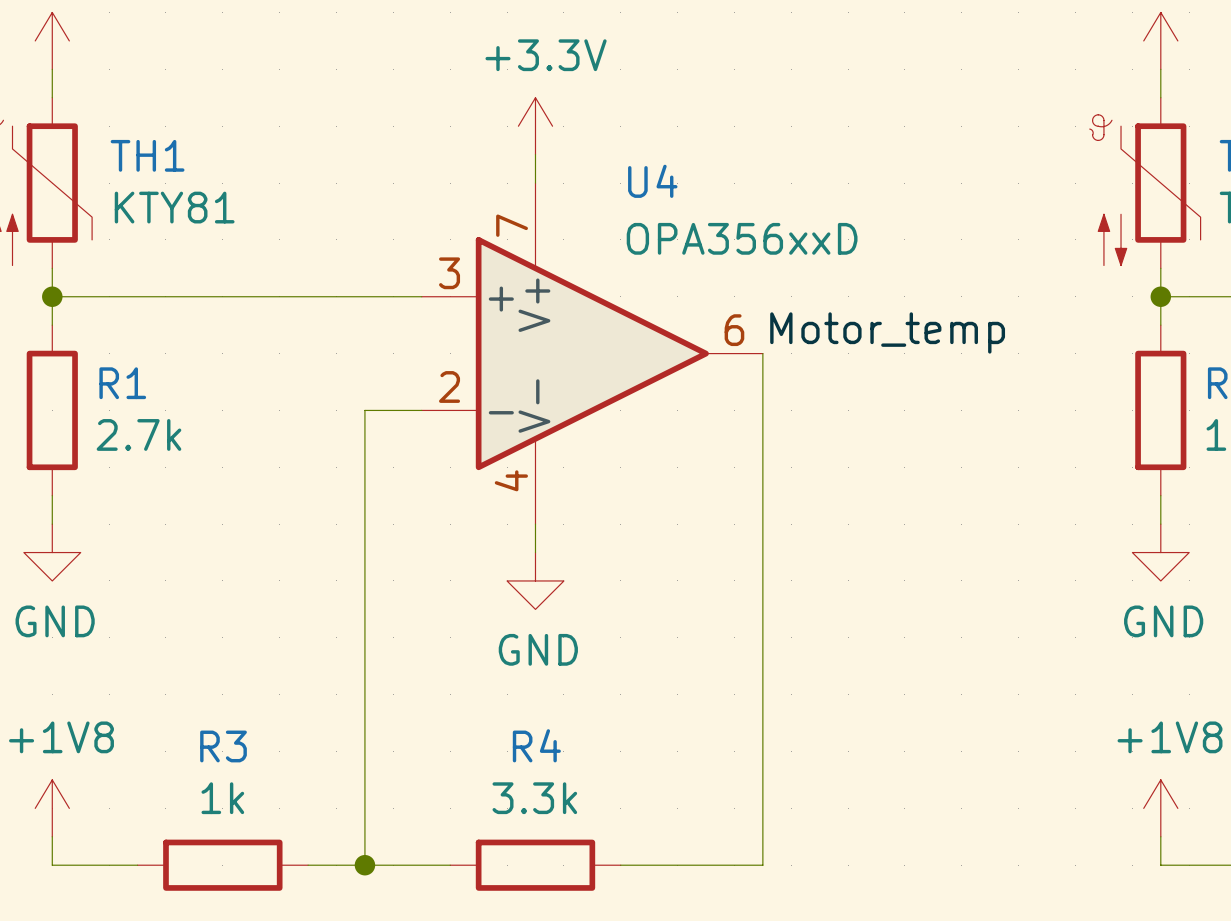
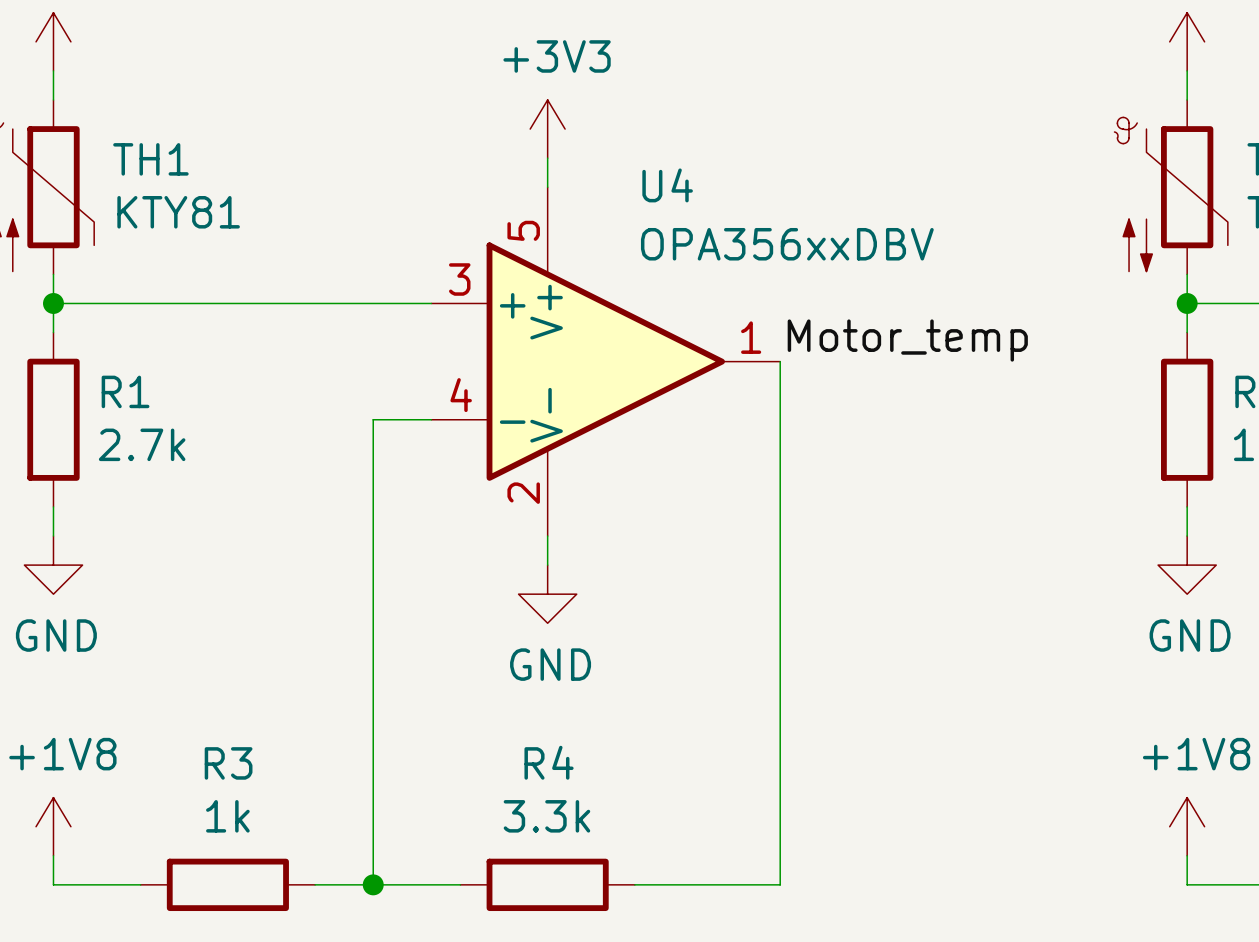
power symbol: +3.3V (535, 126) -> +3V3 (547, 129)
U4 pin number: 7 (512, 225) -> 5 (523, 230)
U4 value: OPA356xxD (742, 238) -> OPA356xxDBV (787, 244)
U4 pin number: 6 (734, 330) -> 1 (751, 337)
U4 pin number: 2 (449, 386) -> 4 (461, 395)
U4 pin number: 4 (511, 480) -> 2 (523, 493)

